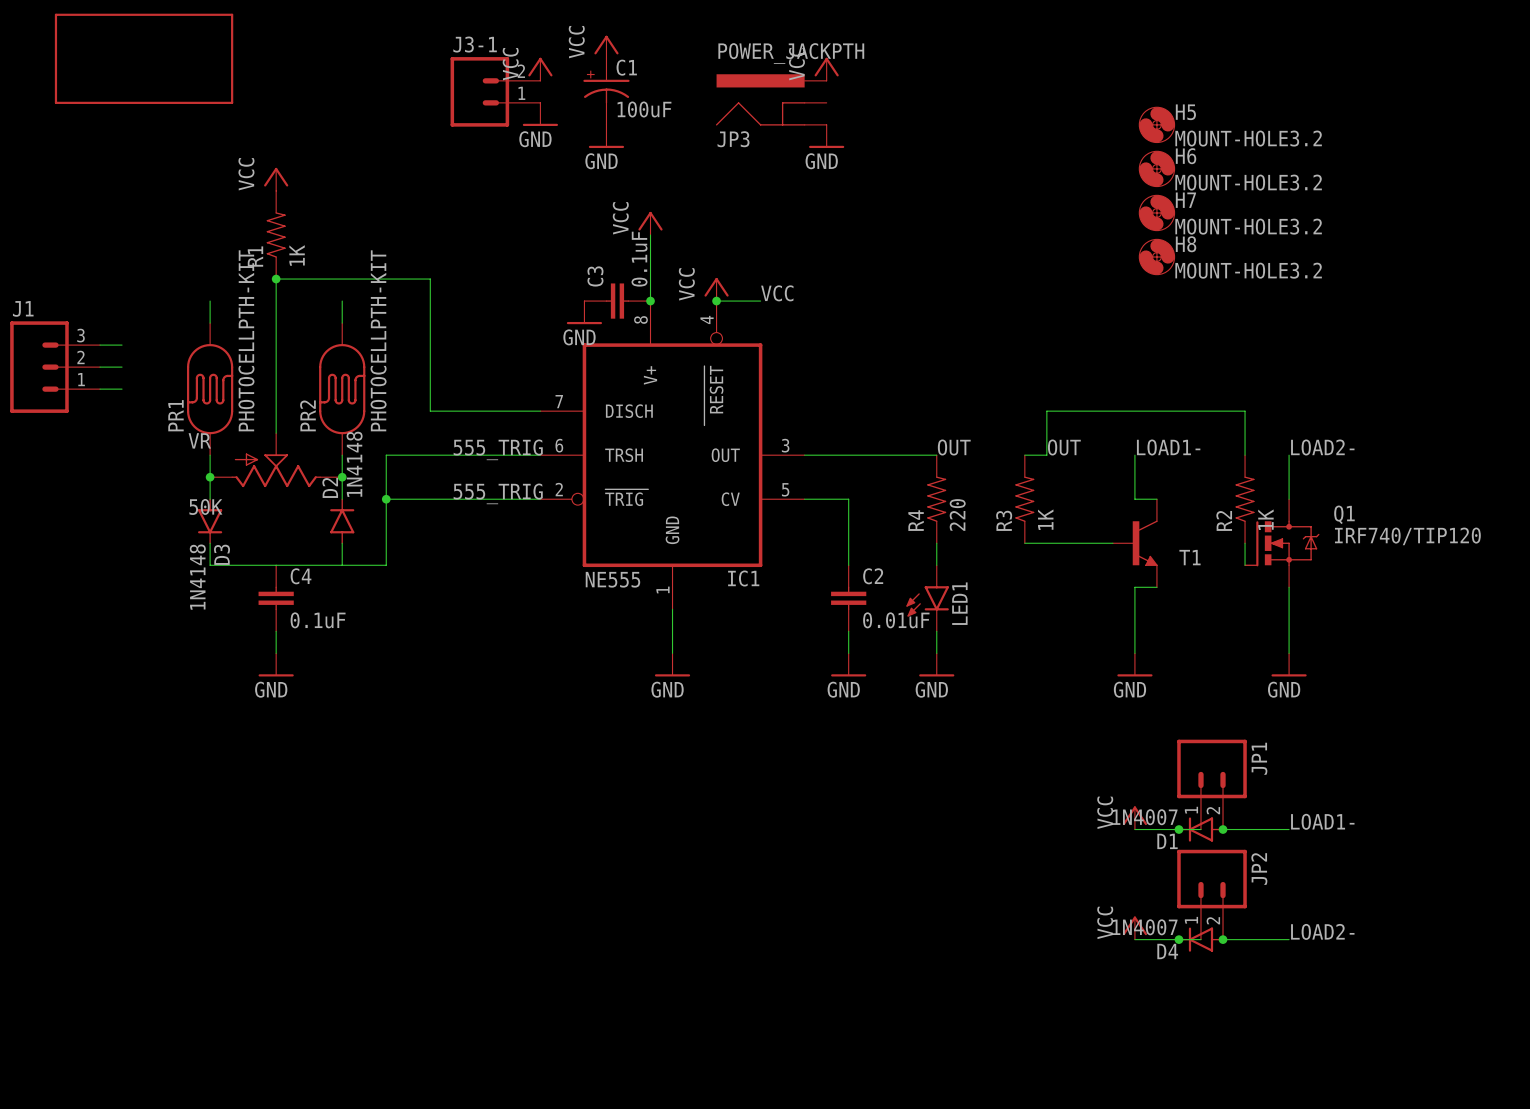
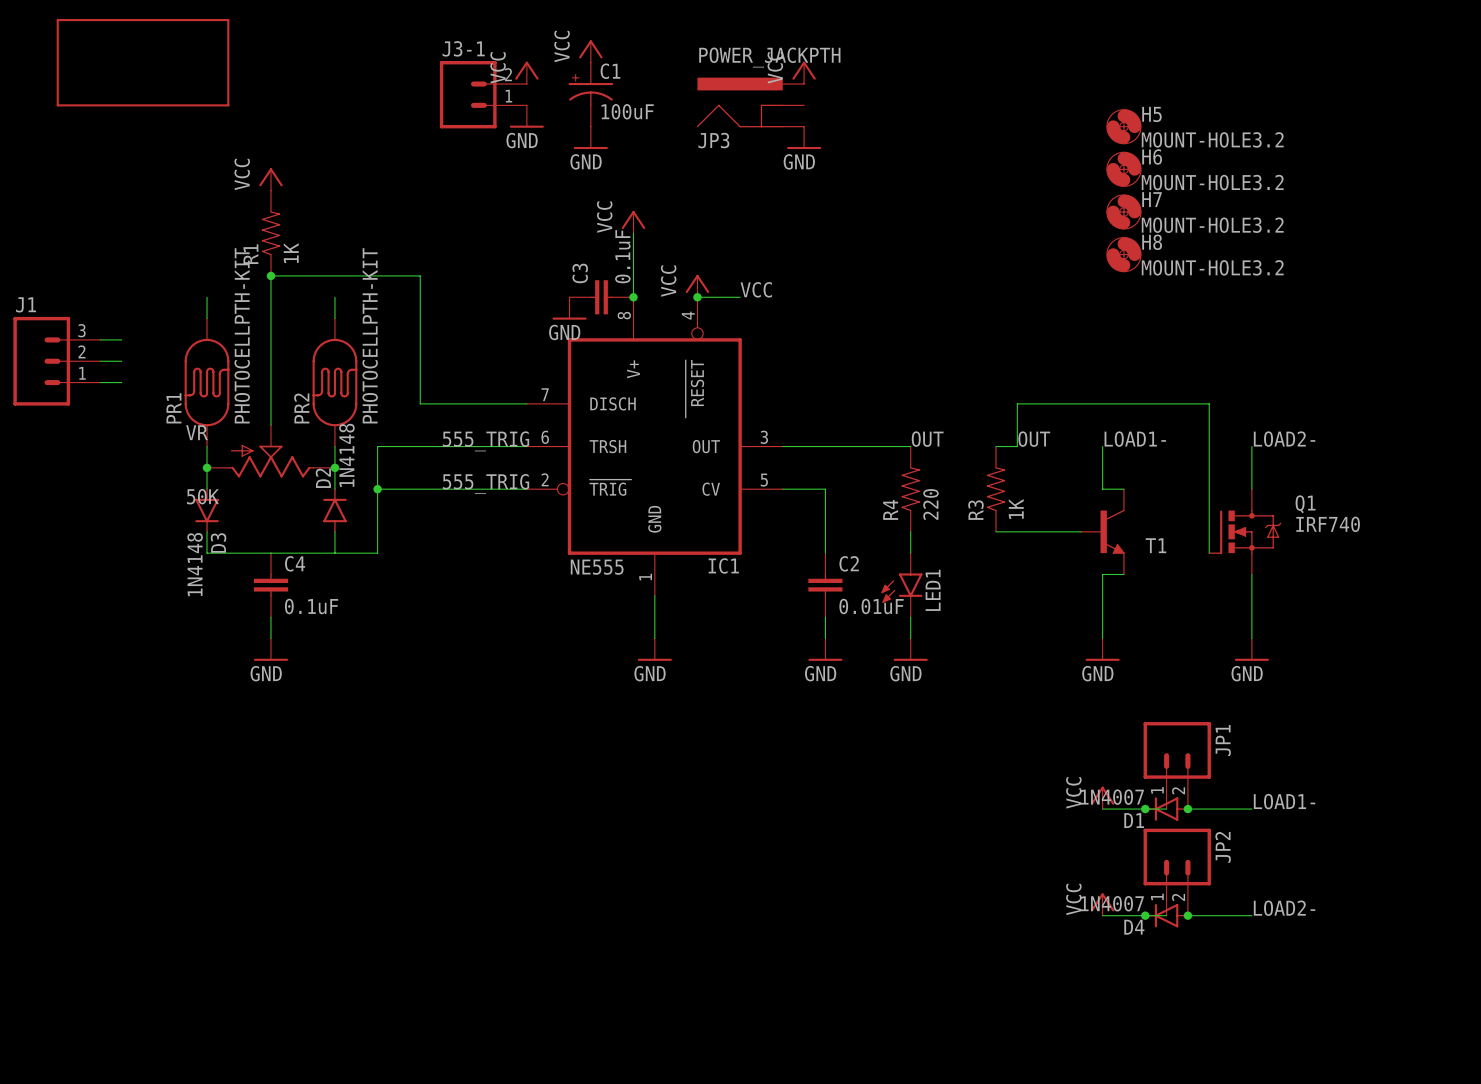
R2: 1K (1245, 499) -> none
Q1 value: IRF740/TIP120 (1407, 536) -> IRF740 (1328, 524)

